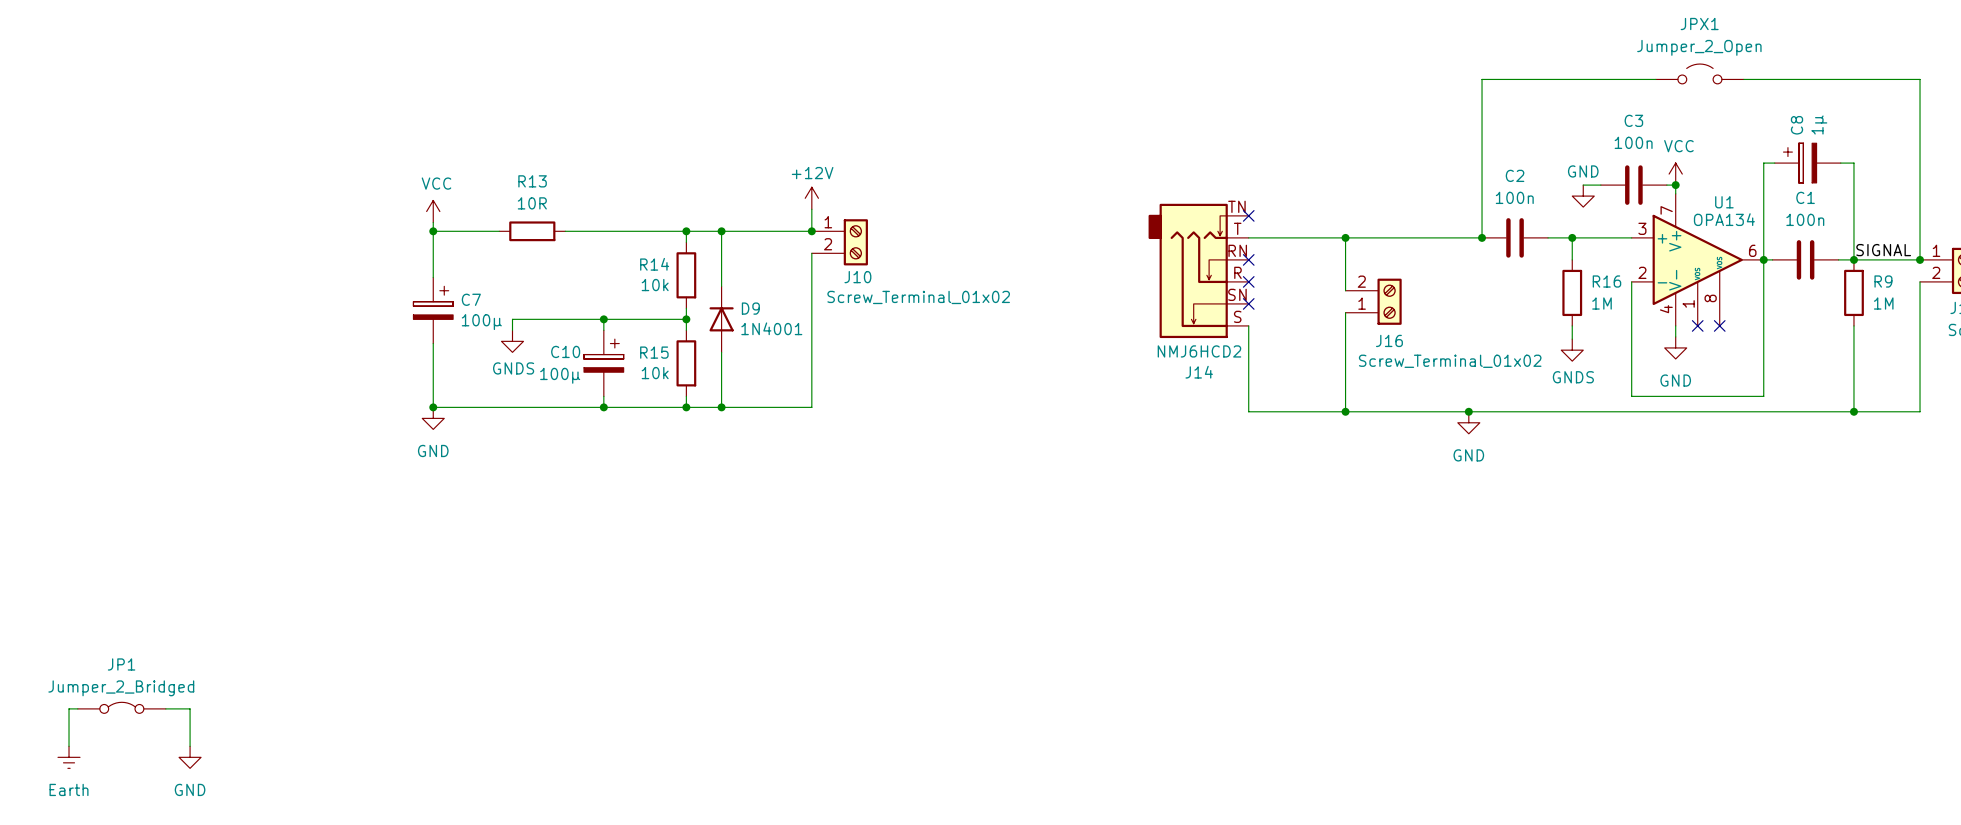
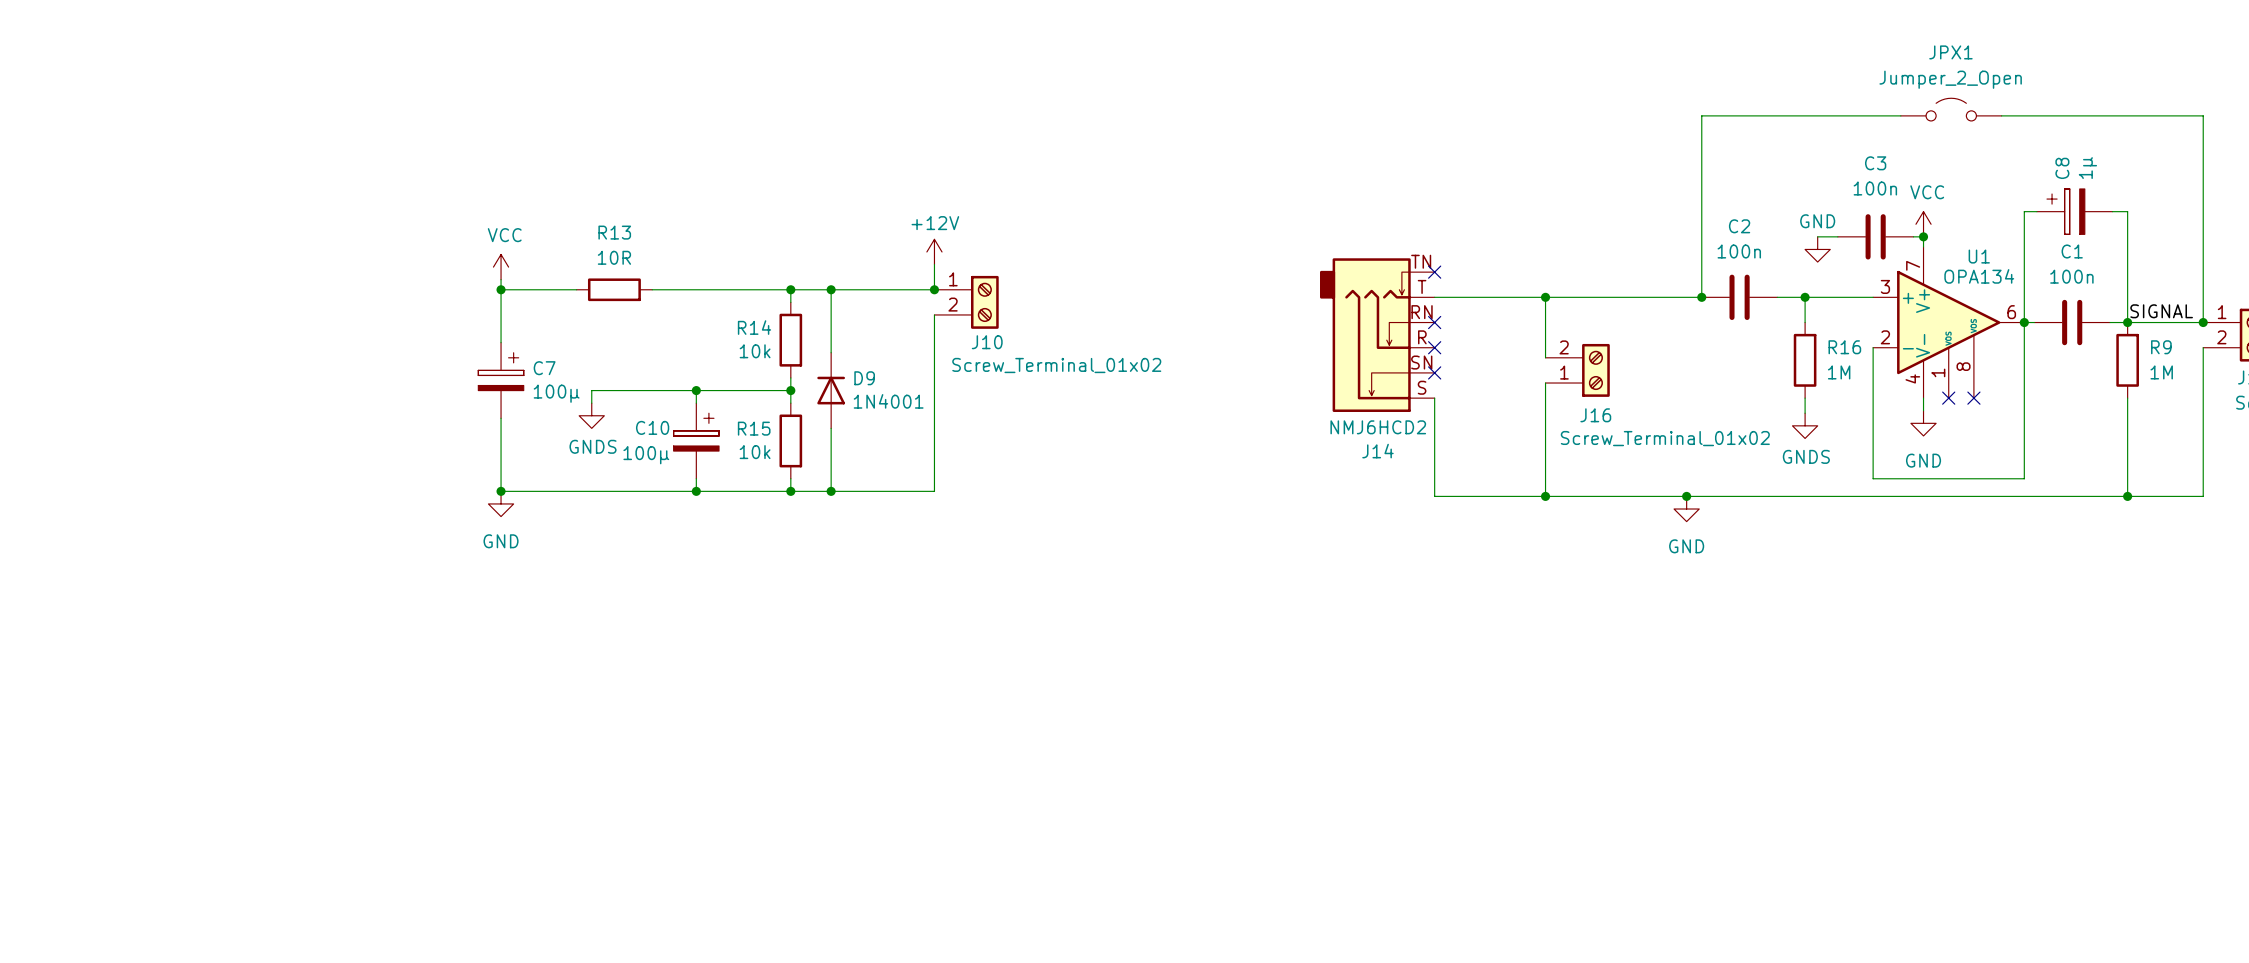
JP1: Jumper_2_Bridged (121, 707) -> none
wire: (77, 708) (69, 708) (69, 746) -> none
wire: (165, 708) (190, 708) (190, 746) -> none
power symbol: Earth (69, 757) -> none
power symbol: GND (190, 757) -> none

